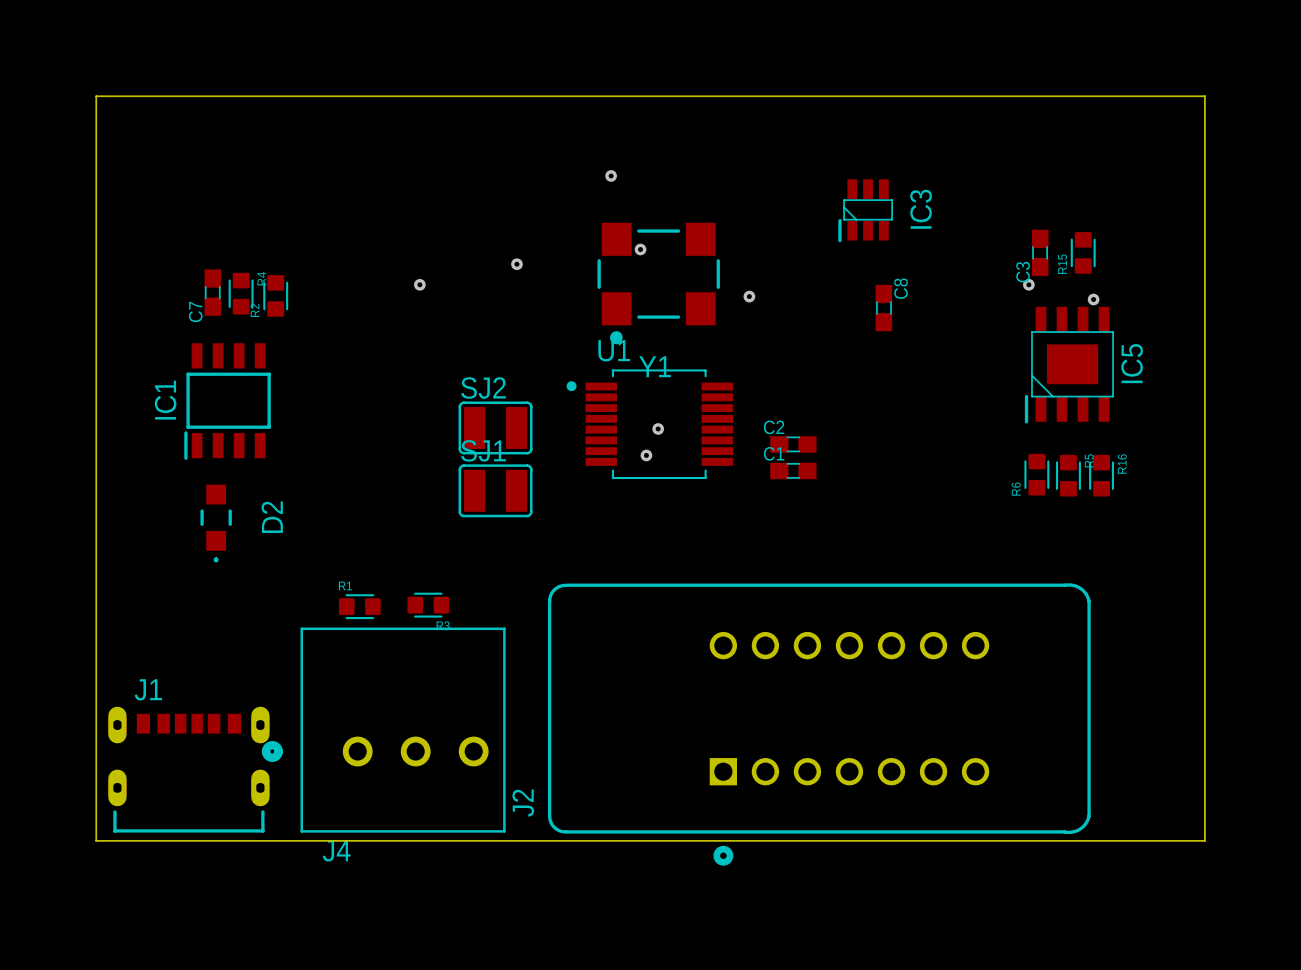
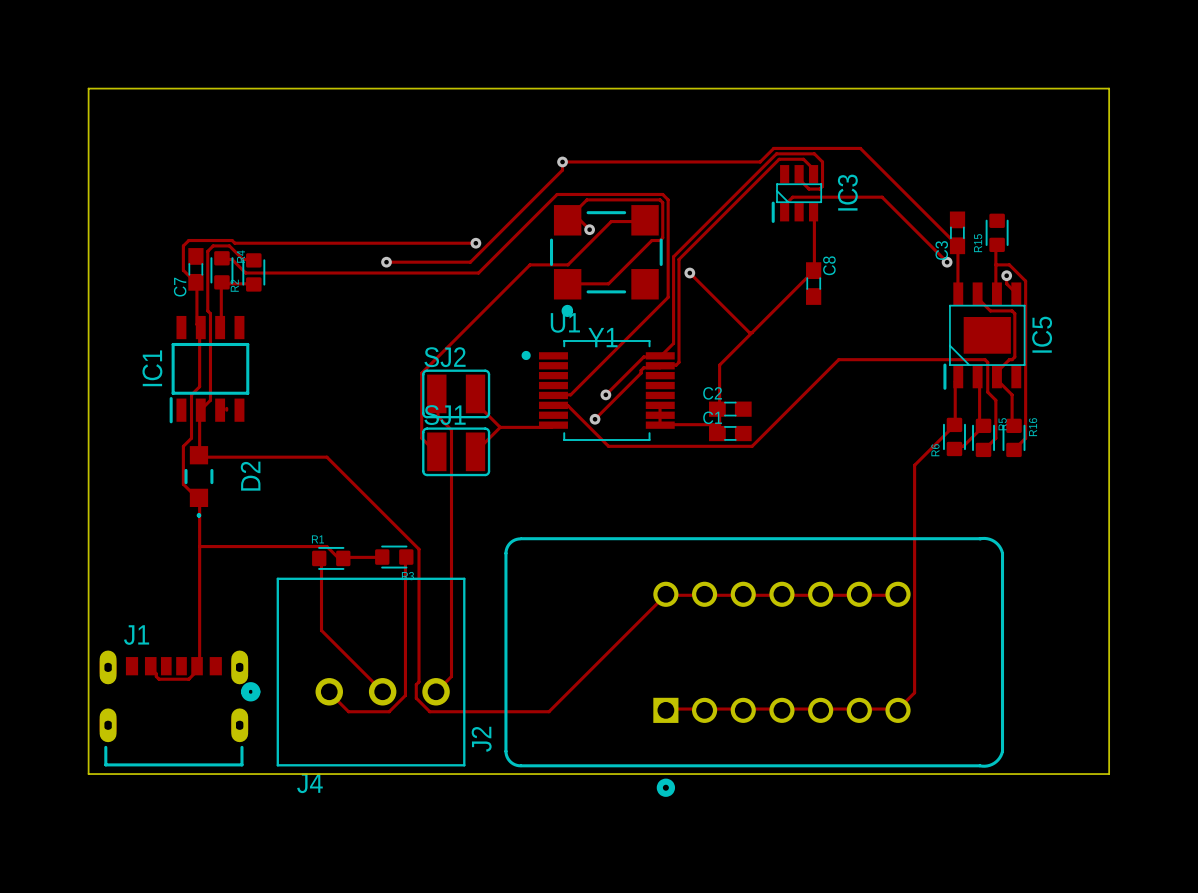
track: none -> (799, 174) (800, 180) (808, 189) (819, 189) (822, 186) (822, 161) (814, 153) (776, 153) (673, 256) (673, 343) (660, 356) (643, 356) (605, 394)
track: none -> (813, 174) (811, 167) (803, 159) (779, 159) (678, 259) (678, 362) (676, 365) (660, 365) (660, 367) (643, 367) (641, 373) (595, 419)
track: none -> (784, 212) (787, 210) (787, 202) (792, 197) (882, 197) (947, 262)
track: none -> (813, 212) (814, 270) (719, 365) (719, 408) (717, 409) (719, 411) (719, 432) (717, 433)
track: none -> (645, 220) (611, 221) (567, 264) (530, 264) (421, 373) (421, 438) (436, 451)
track: none -> (589, 229) (573, 213) (567, 220) (567, 218) (586, 199) (660, 199) (662, 202) (662, 237) (660, 240) (651, 240) (608, 283) (567, 284)
track: none -> (475, 243) (234, 243) (232, 240) (188, 240) (183, 245) (183, 270) (196, 283) (196, 324) (200, 327) (199, 386) (191, 394) (191, 438) (183, 446) (183, 484) (199, 500) (199, 665) (197, 666) (199, 668) (188, 679) (159, 679) (150, 666)
track: none -> (997, 244) (996, 294)
track: none -> (221, 258) (232, 259) (245, 273) (478, 273) (557, 194) (662, 194) (668, 199) (668, 297) (570, 394) (553, 395)
track: none -> (253, 260) (242, 259) (229, 245) (213, 245) (207, 251) (207, 310) (210, 313) (210, 400) (199, 411) (199, 457) (326, 457) (419, 549) (419, 681) (416, 684) (416, 698) (429, 711) (549, 711) (665, 594) (898, 594)
track: none -> (386, 262) (470, 262) (562, 170) (562, 161) (760, 161) (773, 148) (860, 148) (957, 245) (958, 294)
track: none -> (995, 264) (1009, 264) (1025, 281) (1025, 438) (1013, 449)
track: none -> (689, 273) (749, 332) (752, 332)
track: none -> (1006, 275) (1006, 283) (1016, 294)
track: none -> (253, 284) (221, 282) (220, 327)
track: none -> (977, 294) (979, 294) (979, 300) (990, 310) (1012, 310) (1014, 313) (1014, 356) (998, 370) (998, 375) (995, 378) (1012, 394) (1012, 424) (1013, 425)
track: none -> (958, 376) (955, 381) (955, 424) (914, 465) (914, 692) (898, 710) (665, 710)
track: none -> (977, 376) (979, 378) (979, 421) (983, 425) (963, 446) (955, 446) (954, 448)
track: none -> (436, 393) (437, 416) (451, 430) (451, 676) (436, 691)
track: none -> (475, 393) (475, 403) (500, 427)
track: none -> (553, 405) (567, 405) (608, 446) (752, 446) (838, 359) (985, 359) (987, 362) (987, 392) (995, 400) (995, 438) (983, 449)
track: none -> (660, 405) (660, 425) (719, 424)
track: none -> (226, 408) (226, 410)
track: none -> (553, 425) (551, 427) (500, 427)
track: none -> (500, 427) (475, 451)
track: none -> (199, 546) (326, 546) (337, 557) (343, 558) (382, 557)
track: none -> (406, 557) (405, 695) (389, 711) (348, 711) (329, 691)
track: none -> (319, 558) (321, 560) (321, 630) (382, 691)

